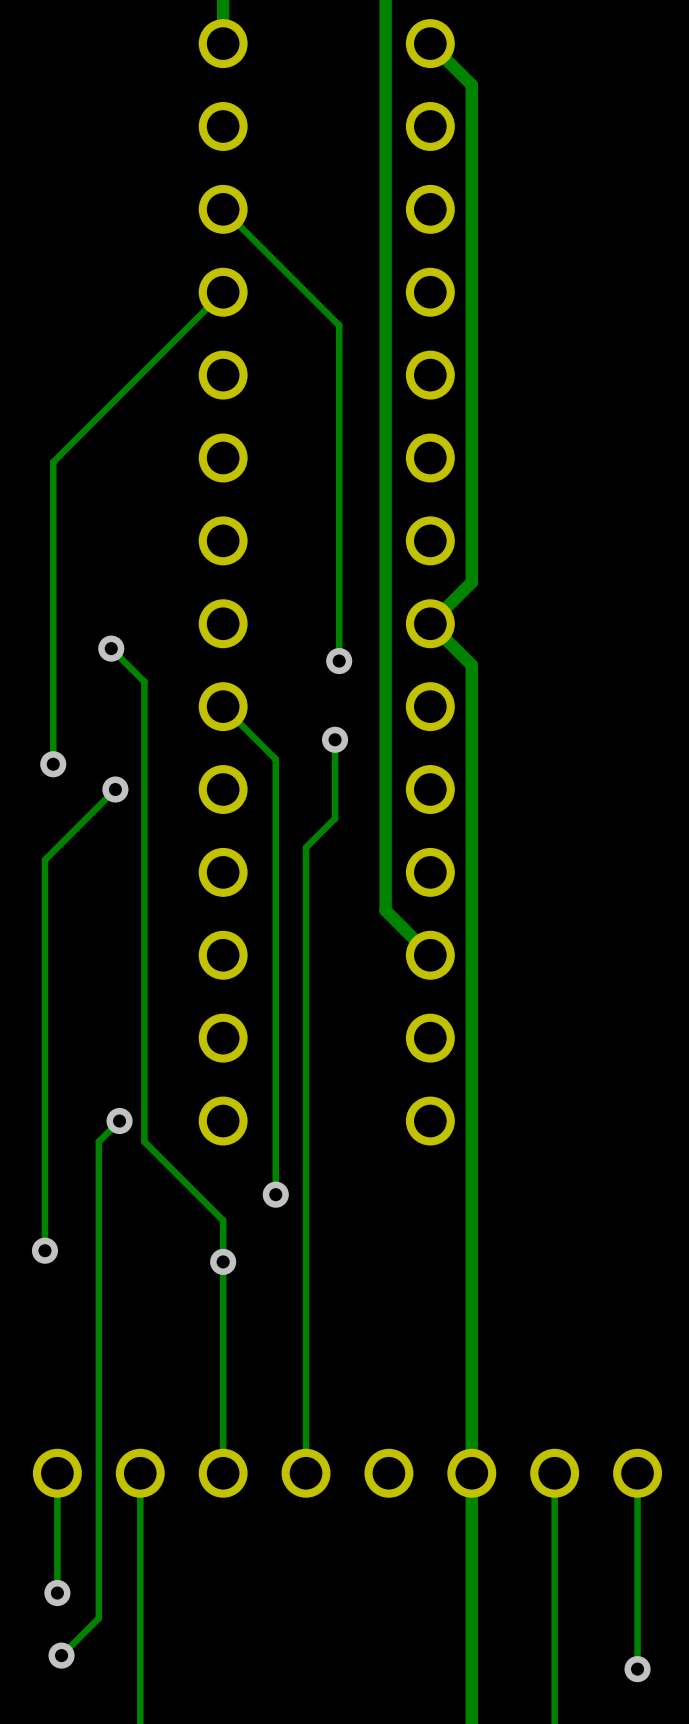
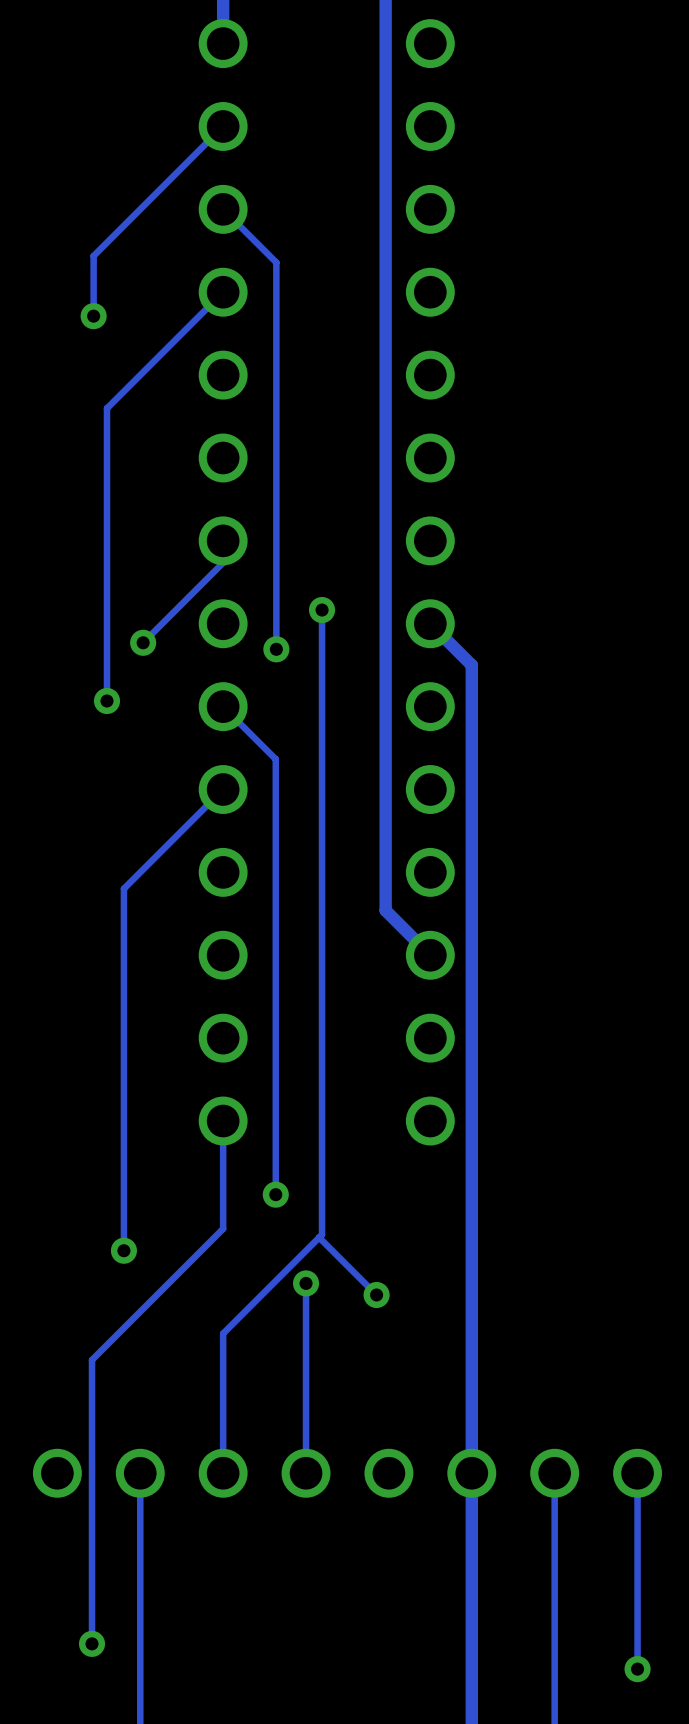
track: (430, 43) (471, 85) (471, 582) (430, 623) -> none
track: none -> (223, 126) (93, 256) (93, 316)
track: (276, 262) (339, 325) (339, 661) -> (276, 262) (276, 649)
via: none -> (93, 316)
track: (106, 408) (53, 462) (53, 764) -> (106, 408) (106, 701)
track: none -> (223, 540) (223, 562) (143, 642)
track: none -> (322, 610) (322, 1234) (319, 1237)
via: none -> (322, 610)
via: none -> (143, 642)
track: (111, 648) (144, 681) (144, 1141) (223, 1220) -> (223, 1121) (223, 1220)
via: (111, 648) -> none
via: none -> (276, 649)
via: (339, 661) -> none
via: none -> (106, 701)
track: (335, 739) (335, 818) (306, 847) (306, 1283) -> none
via: (335, 739) -> none
via: (53, 764) -> none
track: (115, 789) (44, 859) (44, 1250) -> none
via: (115, 789) -> none
track: none -> (223, 789) (123, 888) (123, 1250)
track: (119, 1121) (98, 1141) (98, 1618) (61, 1655) -> none
via: (119, 1121) -> none
track: (223, 1228) (223, 1333) -> (319, 1237) (223, 1333)
track: none -> (223, 1228) (92, 1359) (92, 1643)
track: none -> (319, 1237) (376, 1295)
via: (44, 1250) -> none
via: none -> (123, 1250)
via: (223, 1261) -> none
via: none -> (306, 1283)
via: none -> (376, 1295)
track: (57, 1473) (57, 1593) -> none
via: (57, 1593) -> none
via: none -> (92, 1643)
via: (61, 1655) -> none

